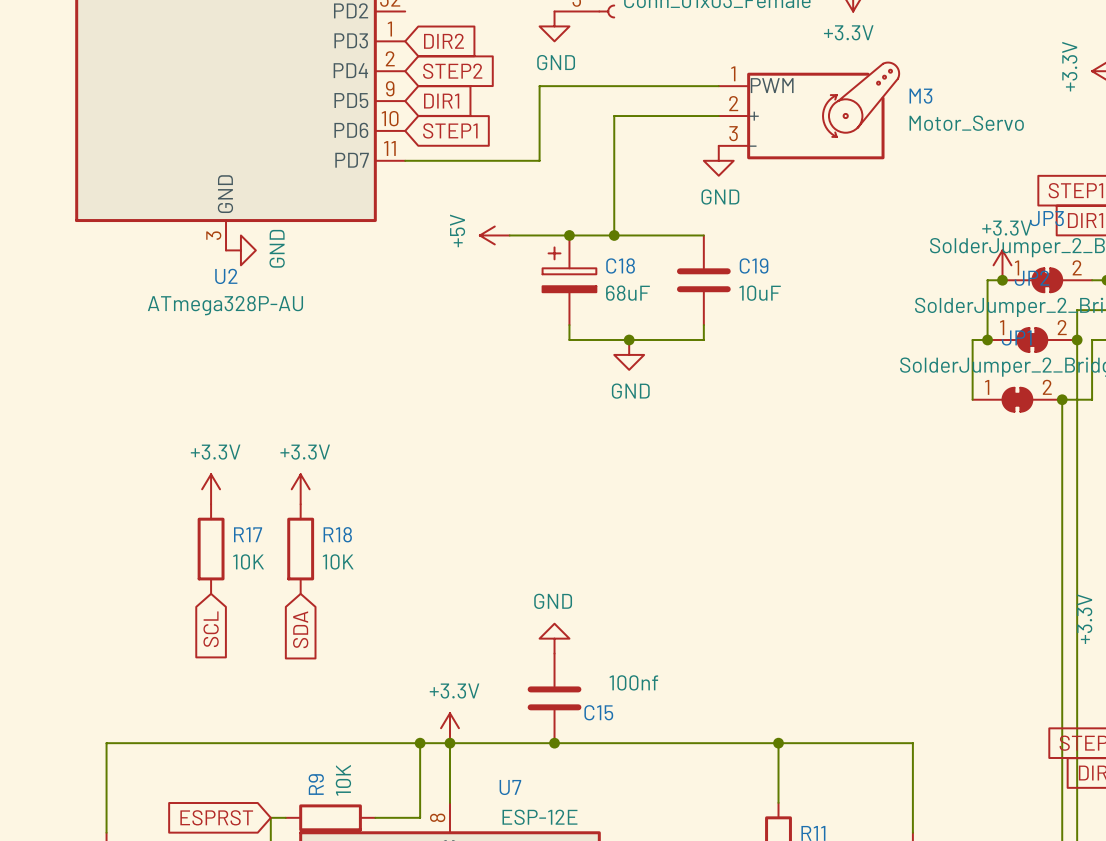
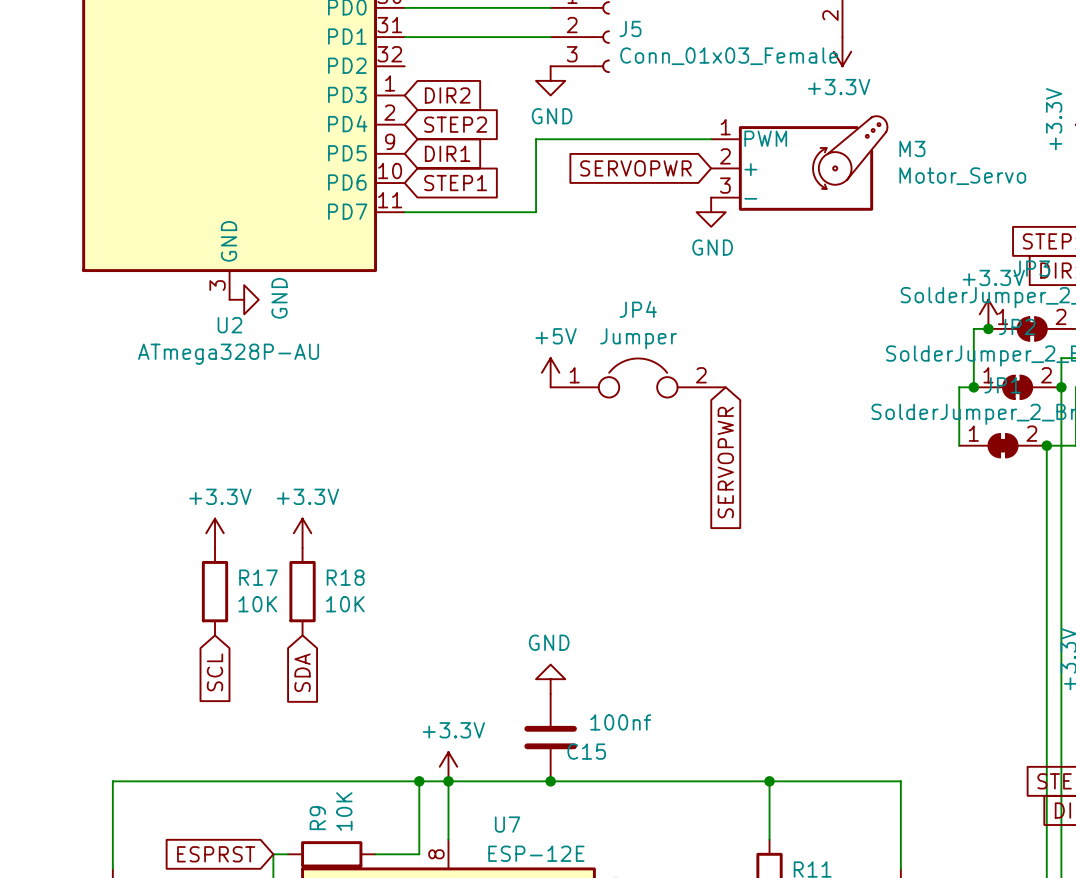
global label: none -> SERVOPWR (635, 168)
wire: (718, 116) (614, 116) (614, 235) -> none
power symbol rotation: 0° (494, 235) -> 90° clockwise (550, 372)
power symbol position: +5V (494, 235) -> +5V (550, 372)
wire: (509, 235) (703, 235) -> none
junction: (569, 235) -> none
junction: (614, 235) -> none
C18: 68uF (569, 280) -> none
C19: 10uF (703, 280) -> none
wire: (569, 325) (569, 339) (703, 339) (703, 325) -> none
JP4: none -> Jumper (638, 377)
junction: (629, 339) -> none
power symbol: GND (629, 354) -> none
global label: none -> SERVOPWR (725, 462)

